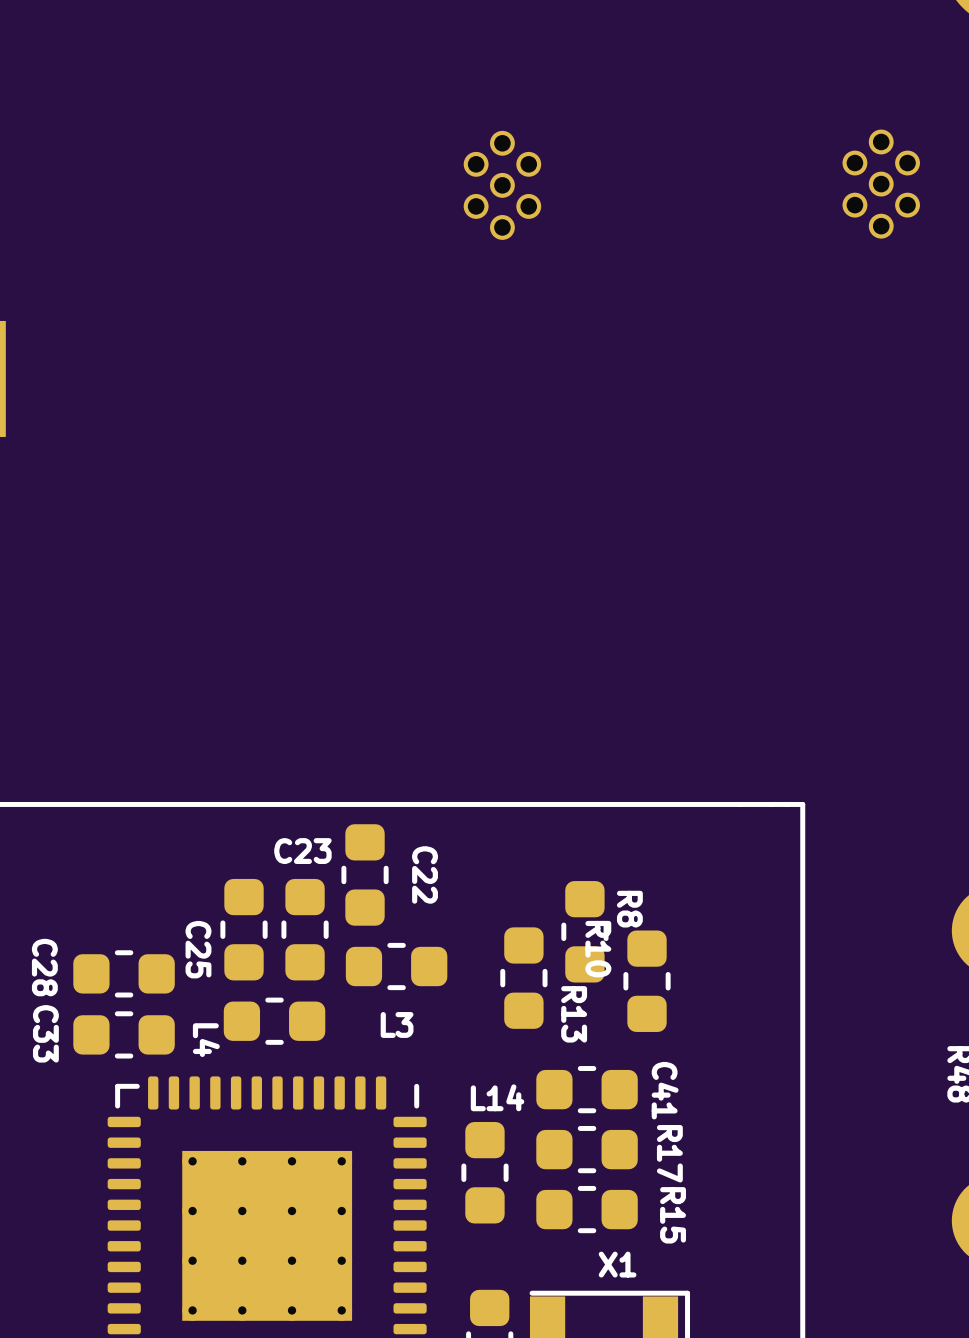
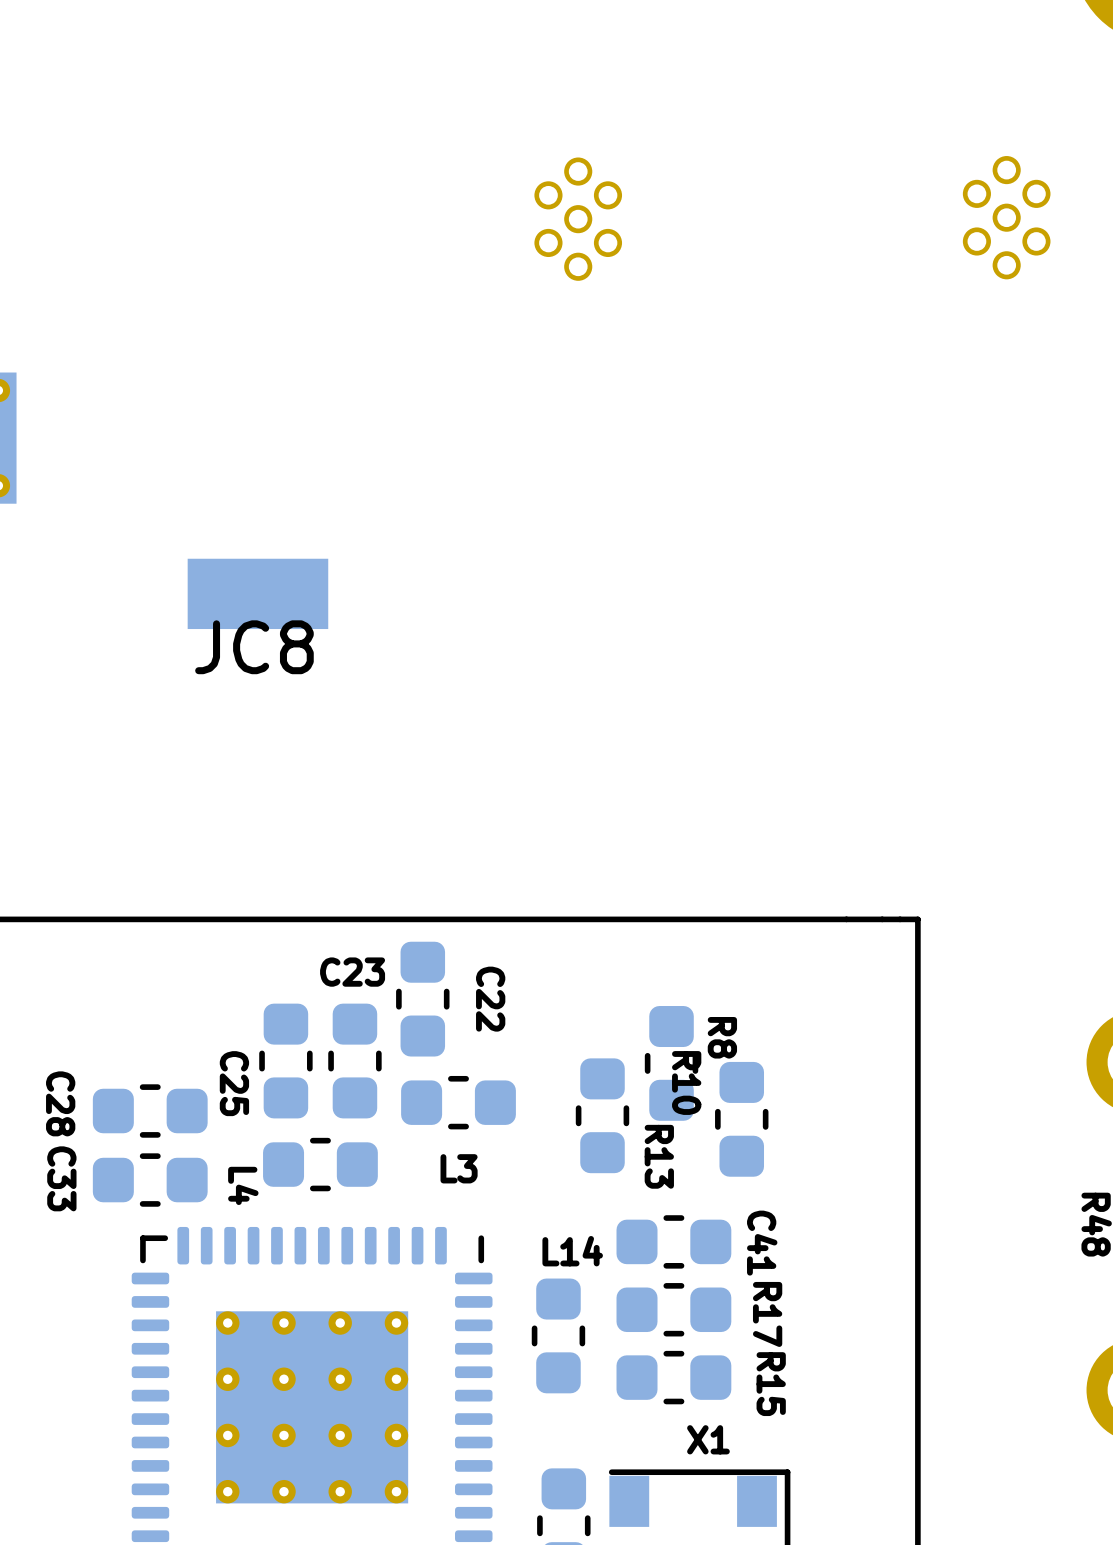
JC8: none -> (257, 593)

